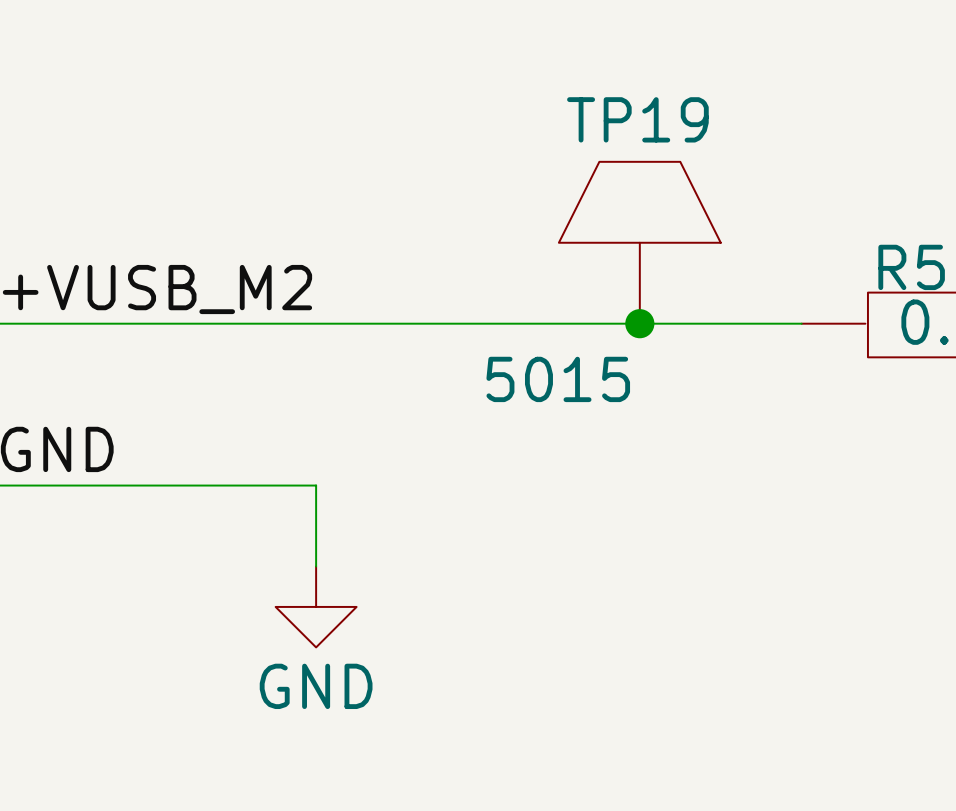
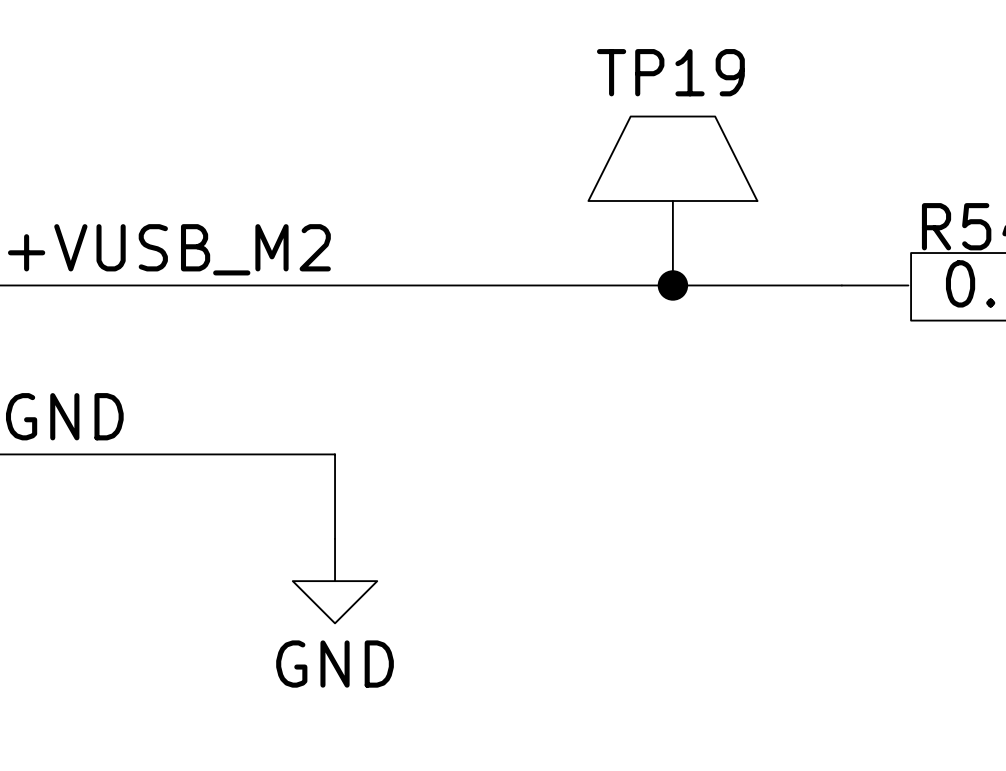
TP19 value: 5015 (558, 379) -> none

